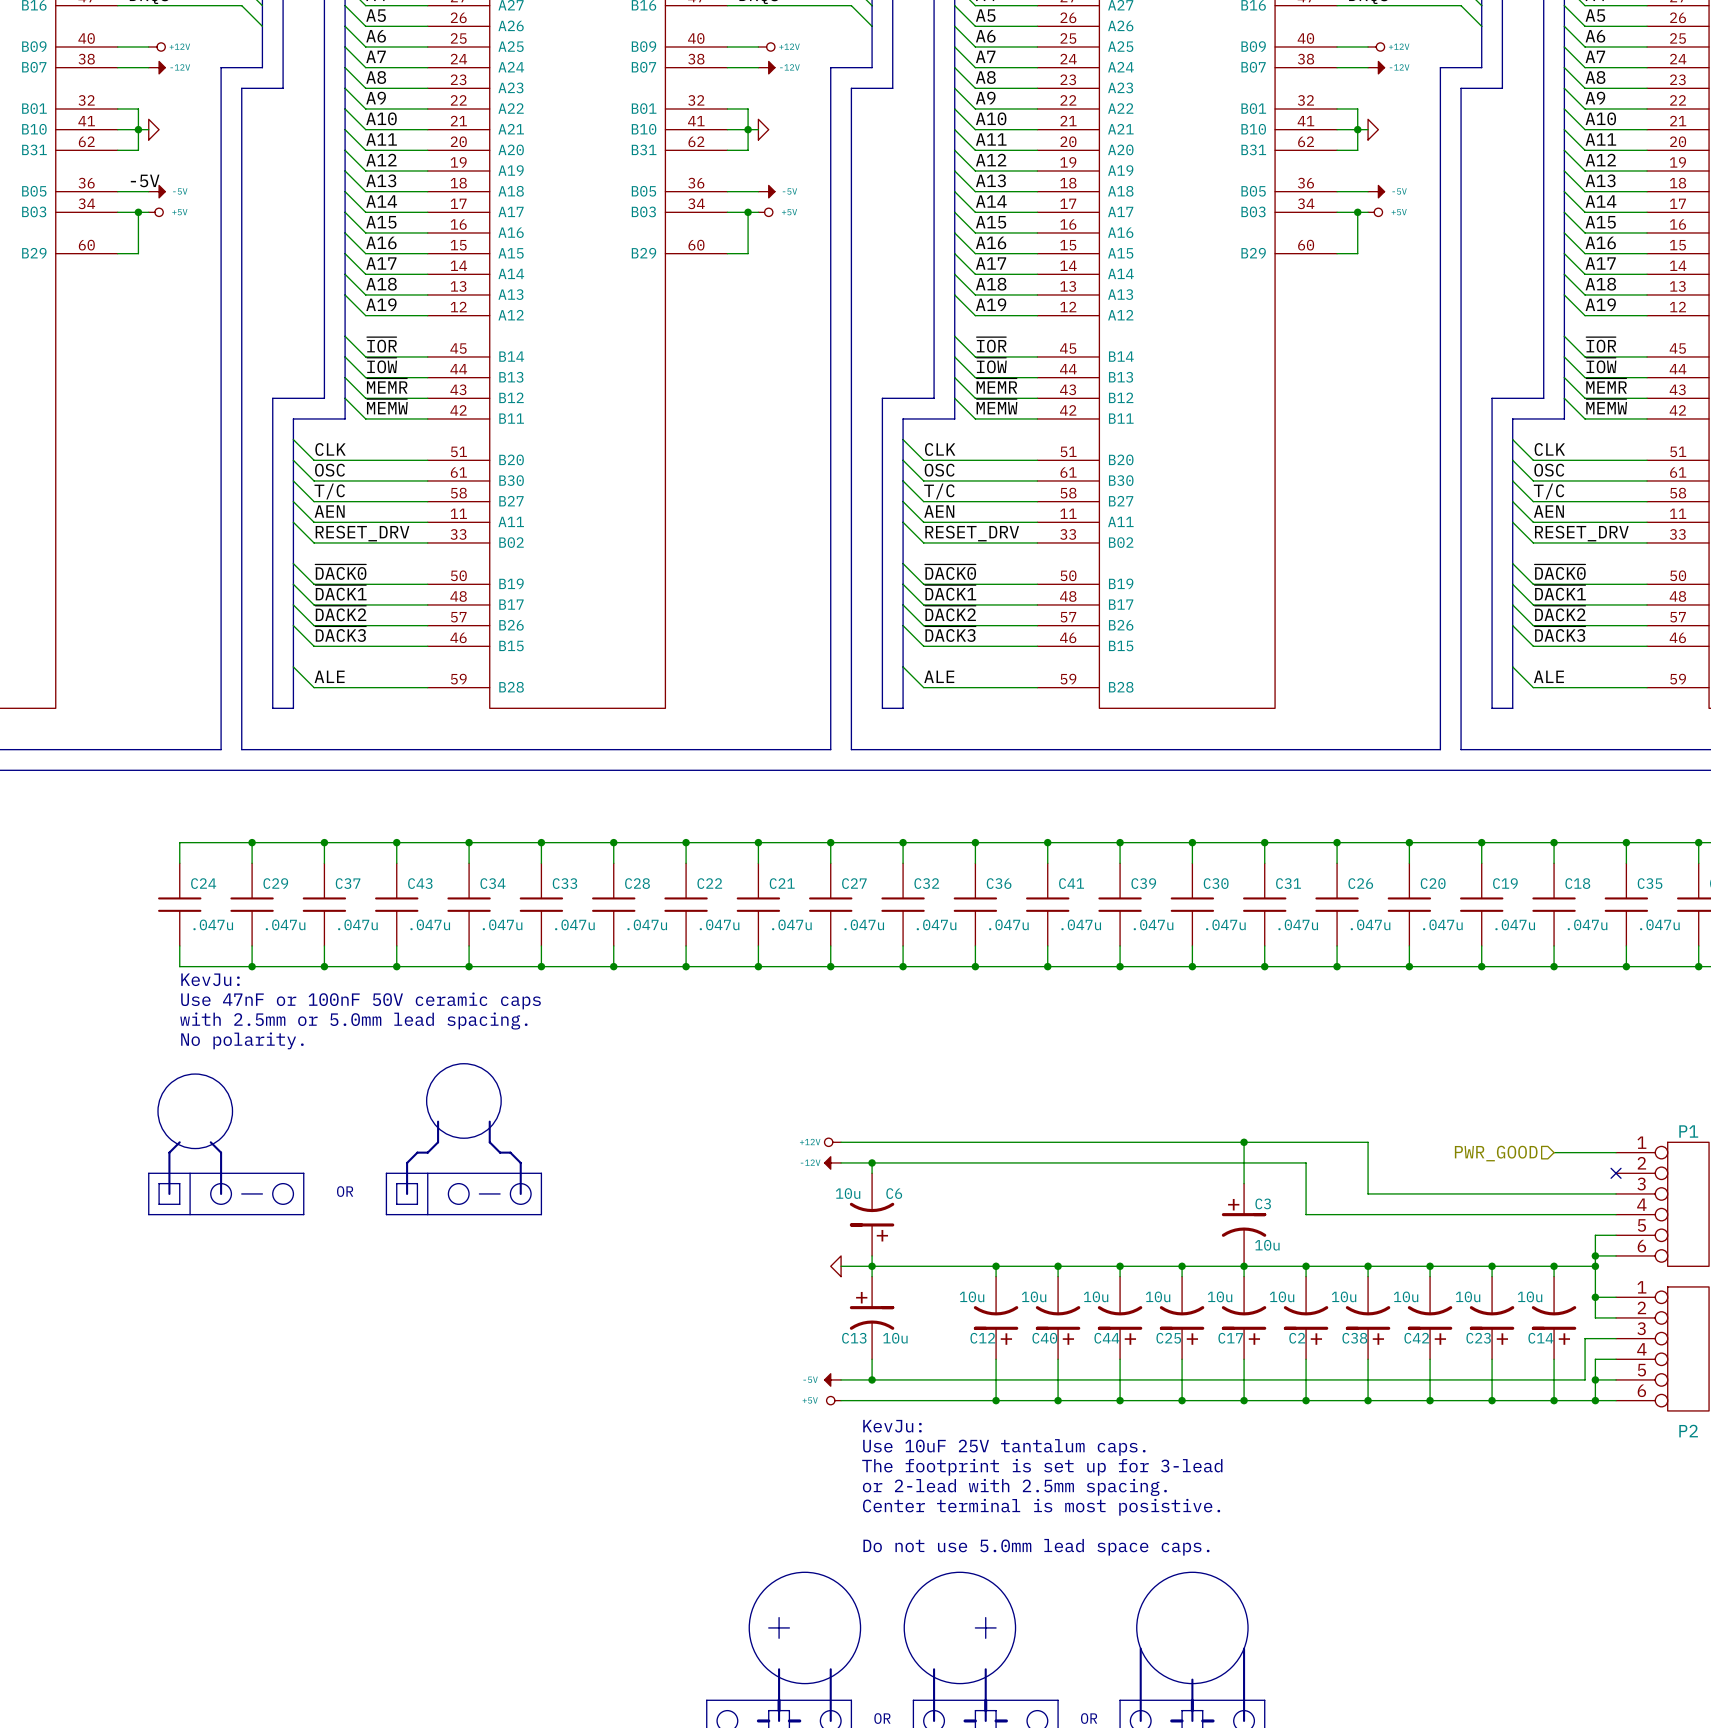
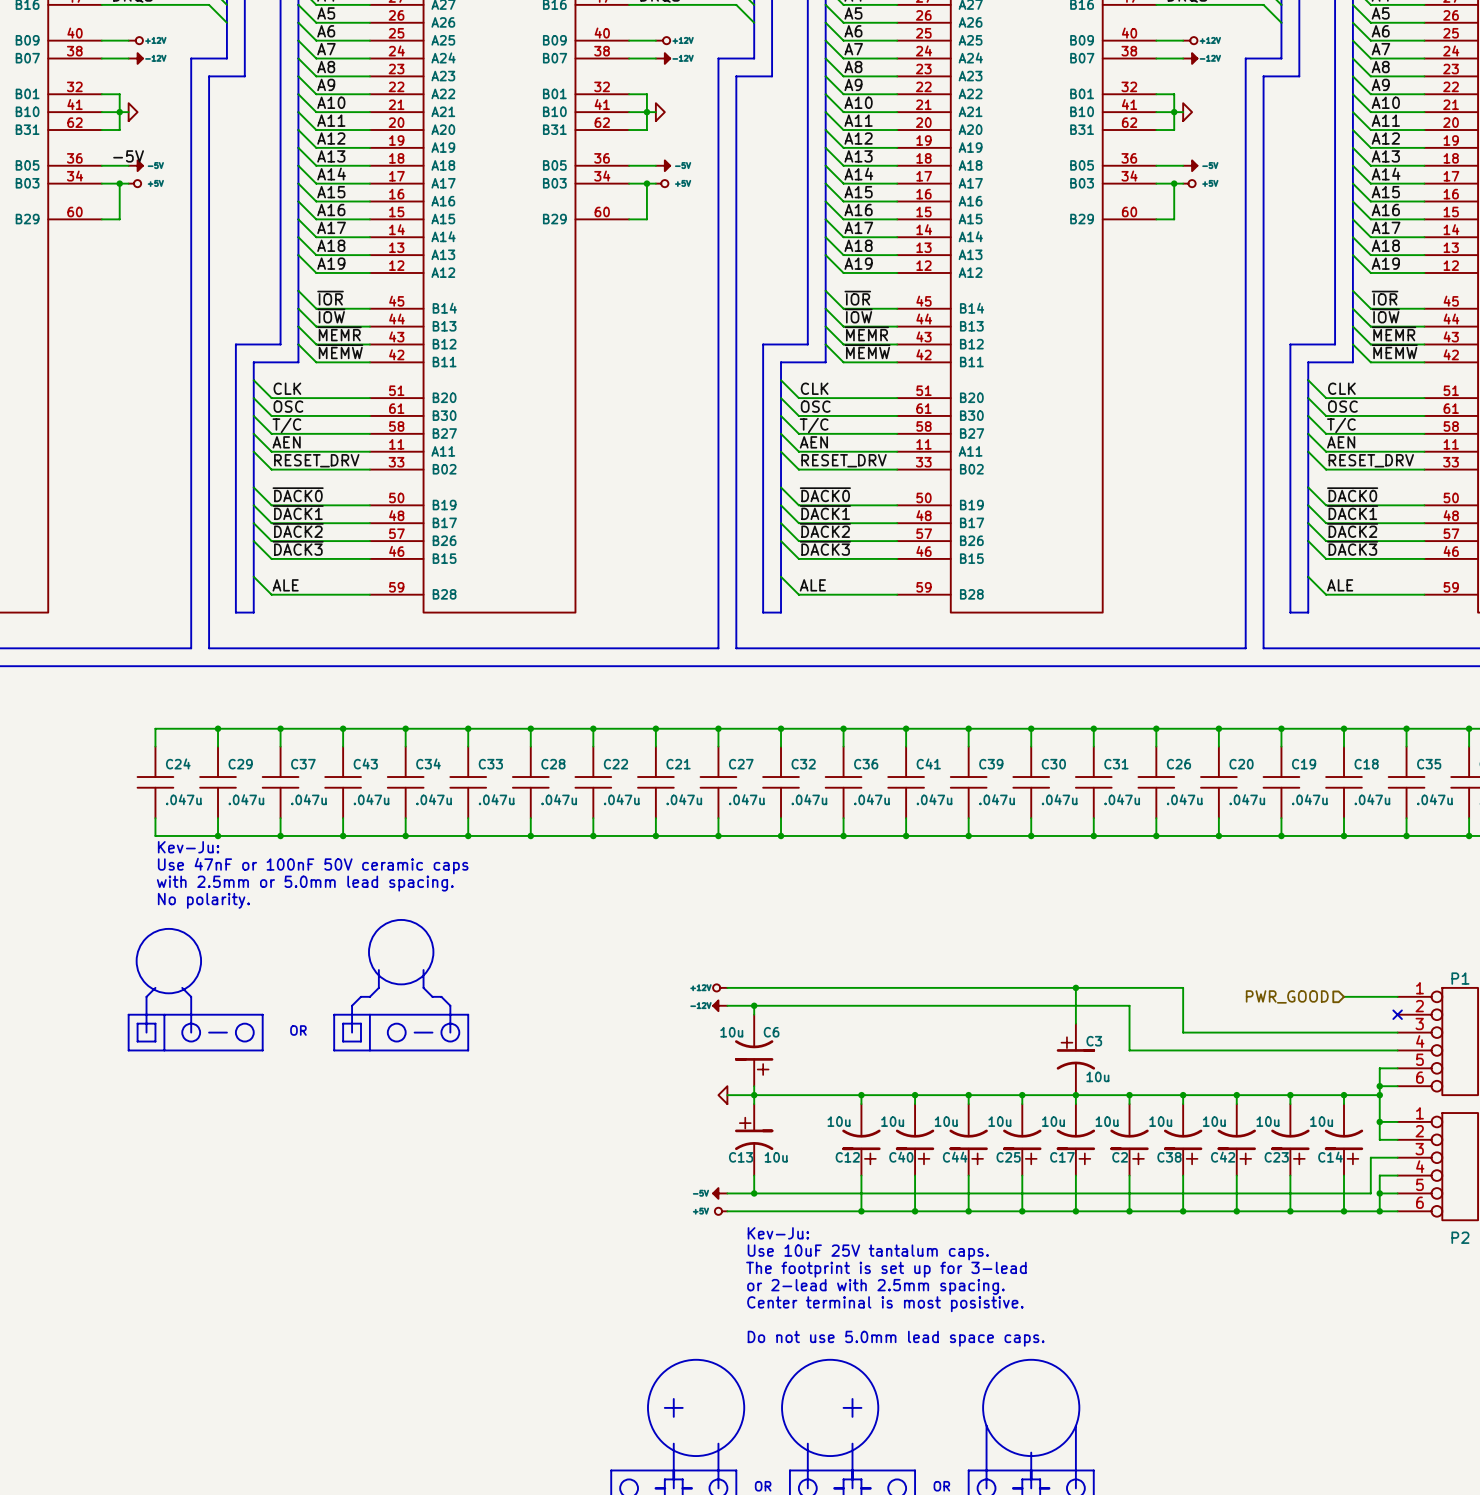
text: KevJu: (210, 979) -> Kev-Ju: (188, 847)
text: KevJu: (892, 1426) -> Kev-Ju: (778, 1233)

